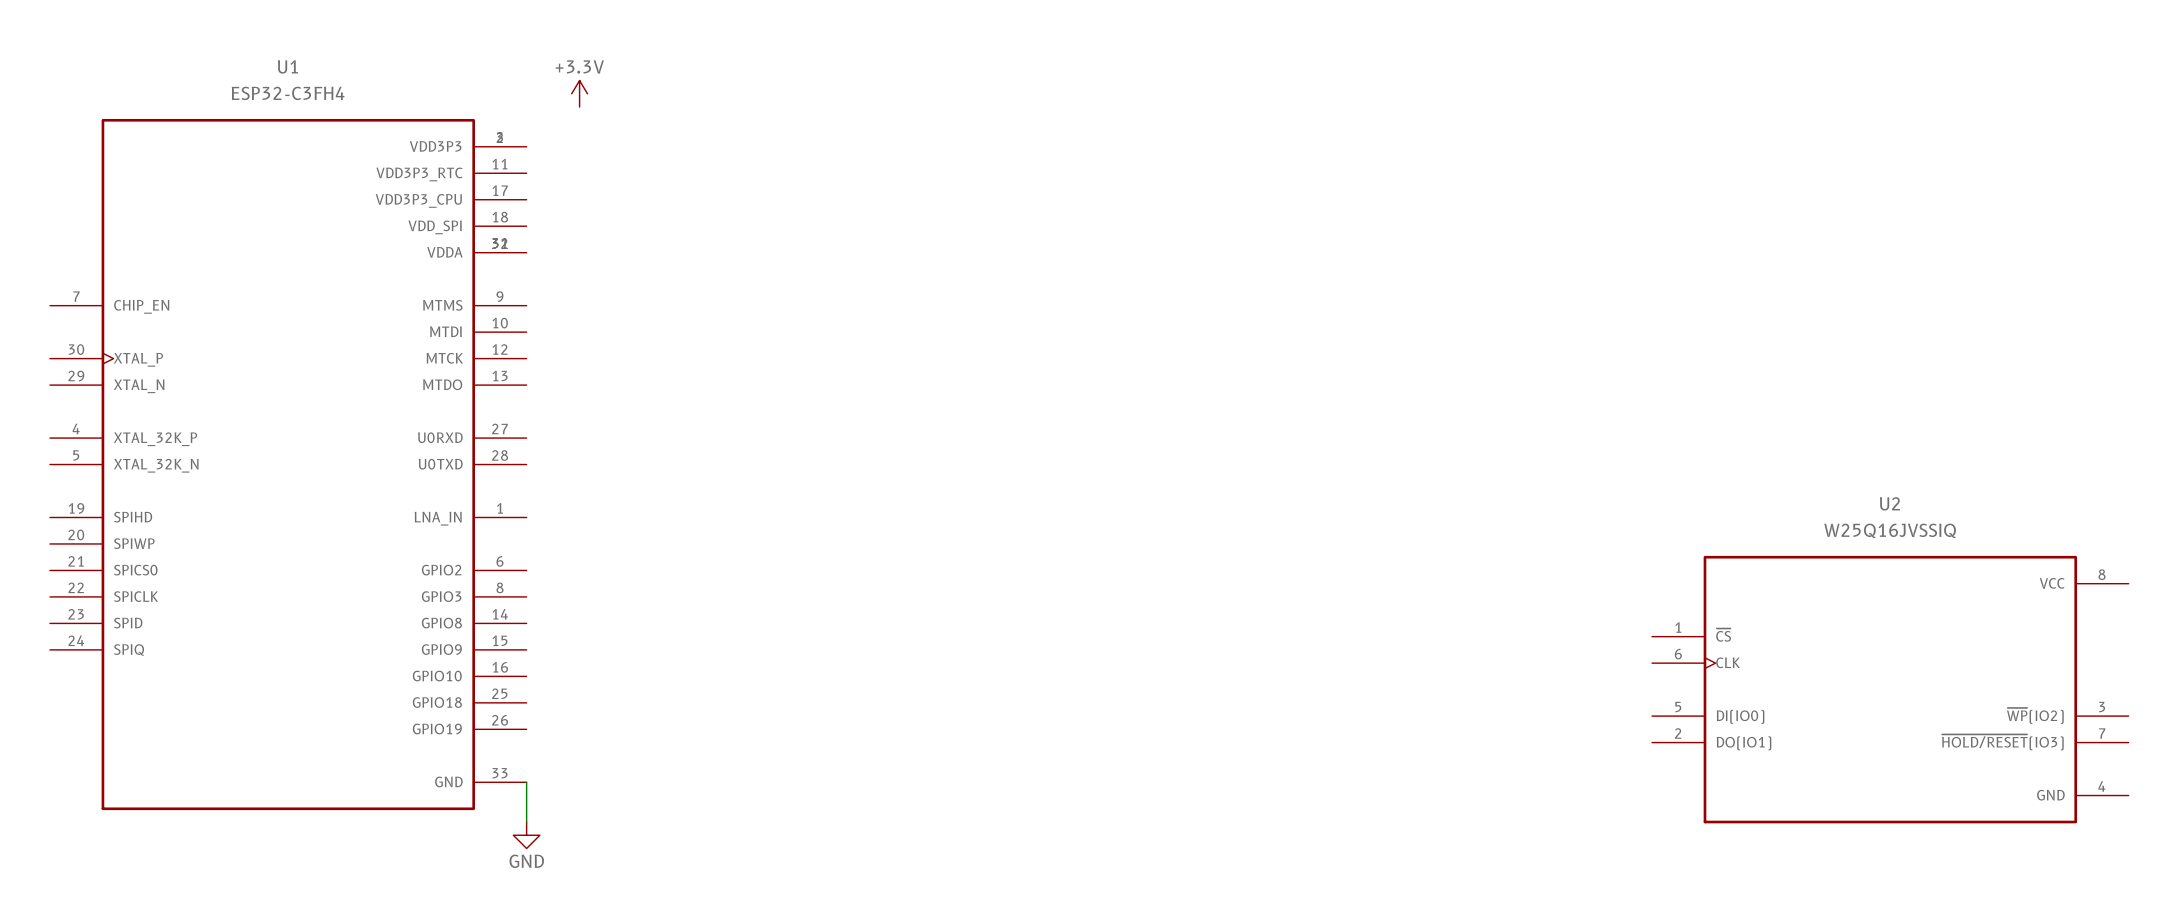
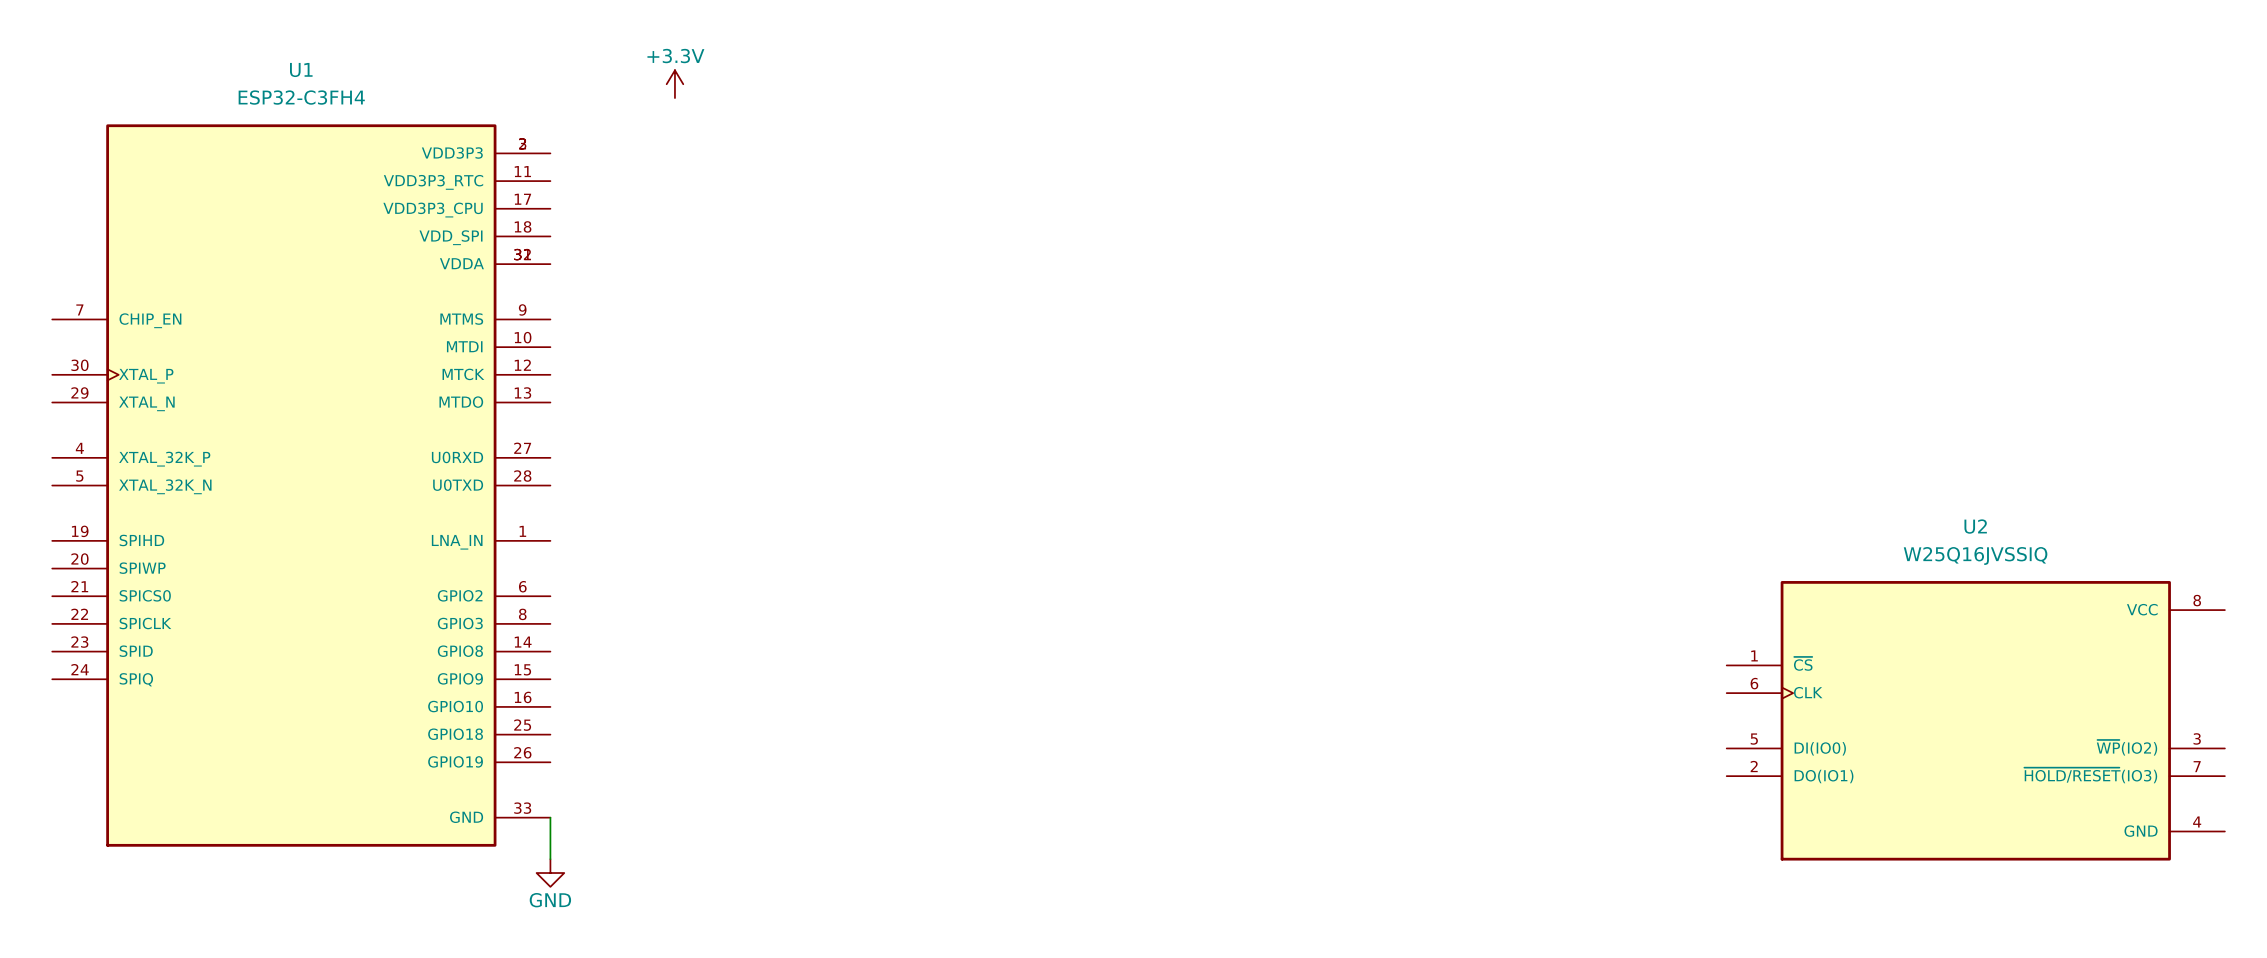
power symbol position: +3.3V (579, 93) -> +3.3V (674, 84)

